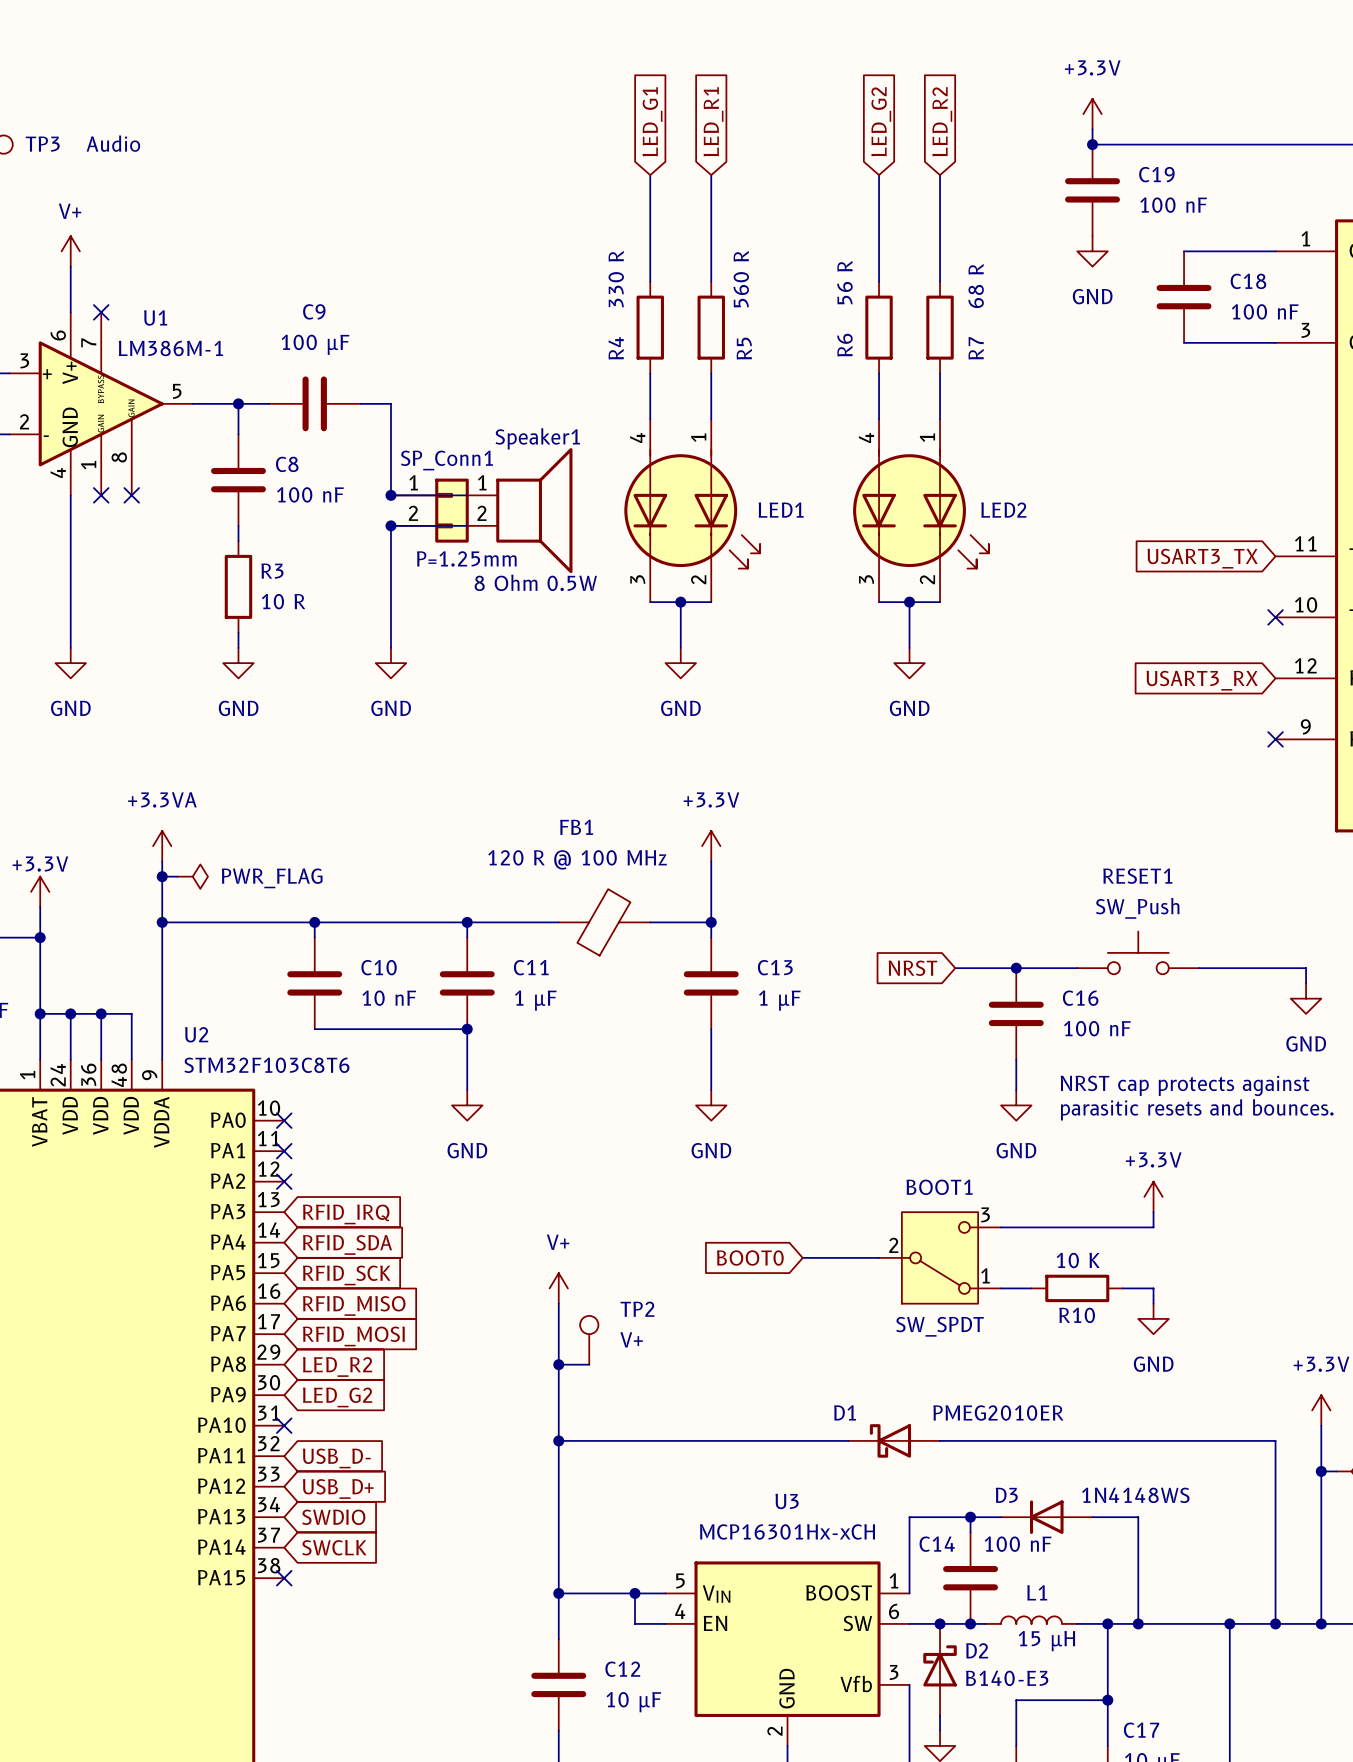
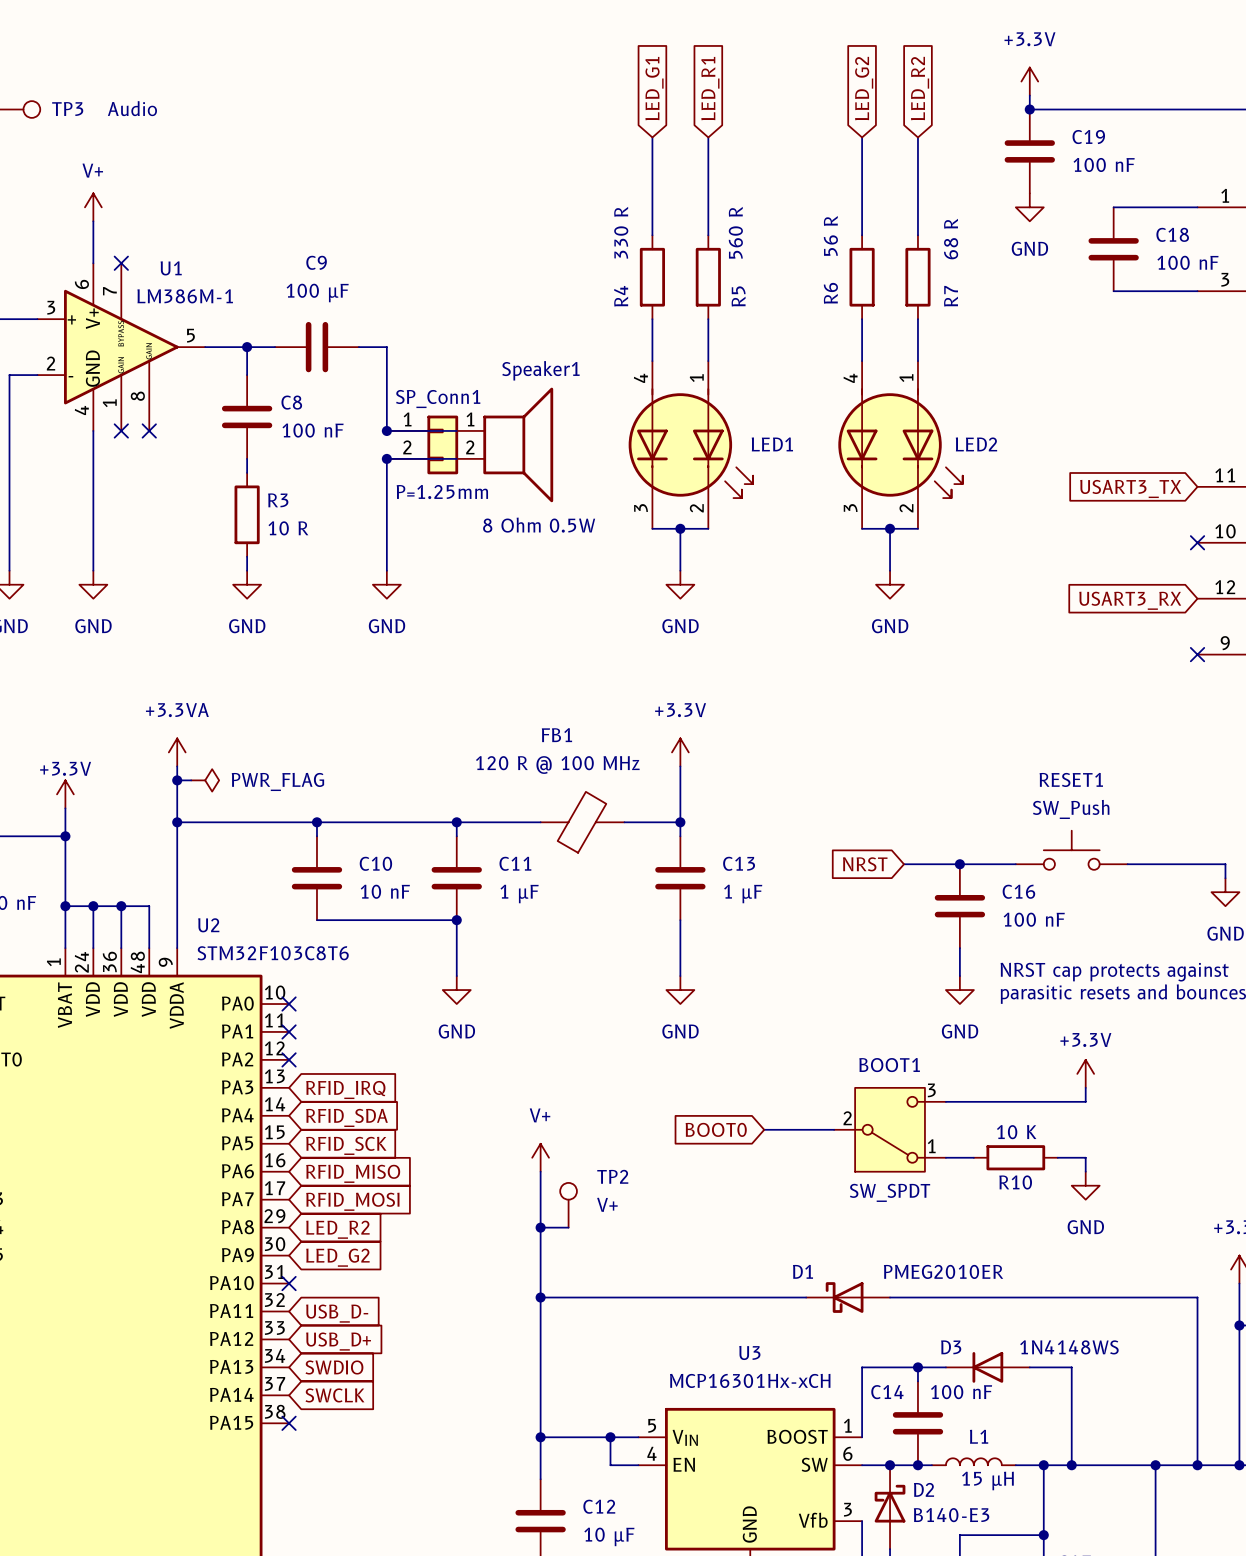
global label position: LED_G1 (652, 121) -> LED_G1 (654, 88)
global label position: LED_R1 (713, 121) -> LED_R1 (710, 88)
global label position: LED_G2 (881, 121) -> LED_G2 (864, 88)
global label position: LED_R2 (942, 121) -> LED_R2 (920, 88)
wire: (650, 175) (650, 281) -> (652, 137) (652, 235)
wire: (711, 175) (711, 281) -> (708, 137) (708, 235)
wire: (879, 175) (879, 281) -> (862, 137) (862, 235)
wire: (940, 175) (940, 281) -> (917, 137) (917, 235)
R4 position: (650, 327) -> (652, 277)
R5 position: (711, 327) -> (708, 277)
R6 position: (879, 327) -> (862, 277)
R7 position: (940, 327) -> (917, 277)
wire: (650, 373) (650, 419) -> (652, 319) (652, 361)
wire: (711, 373) (711, 419) -> (708, 319) (708, 361)
wire: (879, 373) (879, 419) -> (862, 319) (862, 361)
wire: (940, 373) (940, 419) -> (917, 319) (917, 361)
Speaker1 name position: Speaker1 (537, 438) -> Speaker1 (540, 370)
LED1 position: (692, 510) -> (690, 444)
LED2 position: (920, 510) -> (900, 444)
SP_Conn1 value position: P=1.25mm (466, 558) -> P=1.25mm (442, 492)
Speaker1 value position: 8 Ohm 0.5W (535, 582) -> 8 Ohm 0.5W (539, 525)
wire: (650, 602) (680, 602) (680, 647) -> none
junction position: (680, 602) -> (680, 528)
wire: none -> (708, 528) (680, 528) (680, 570)
wire: (879, 602) (909, 602) (909, 647) -> none
junction position: (909, 602) -> (890, 528)
wire: none -> (917, 528) (890, 528) (890, 570)
power symbol position: GND (680, 663) -> GND (680, 584)
power symbol position: GND (909, 663) -> GND (890, 584)

